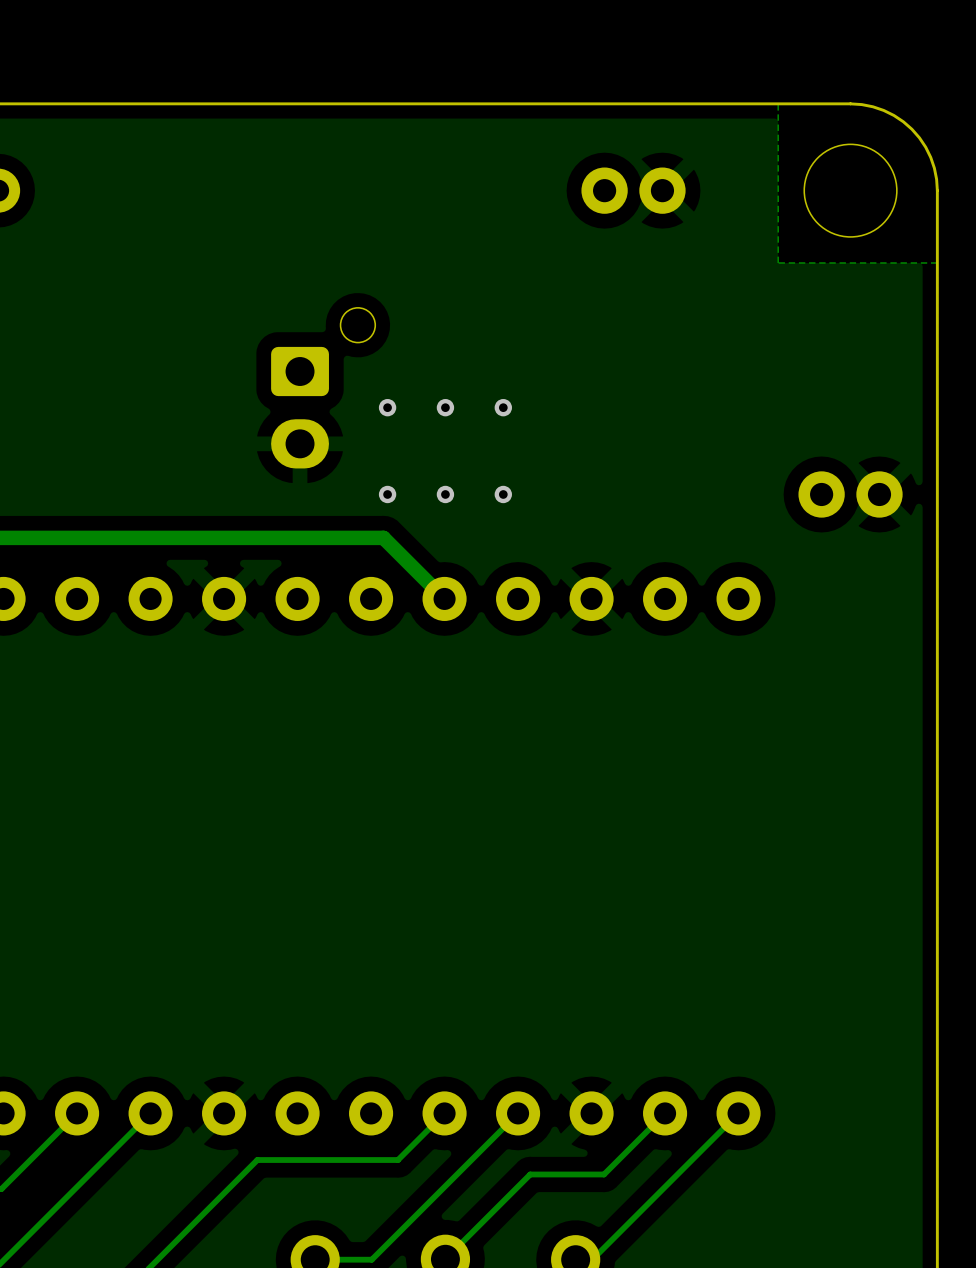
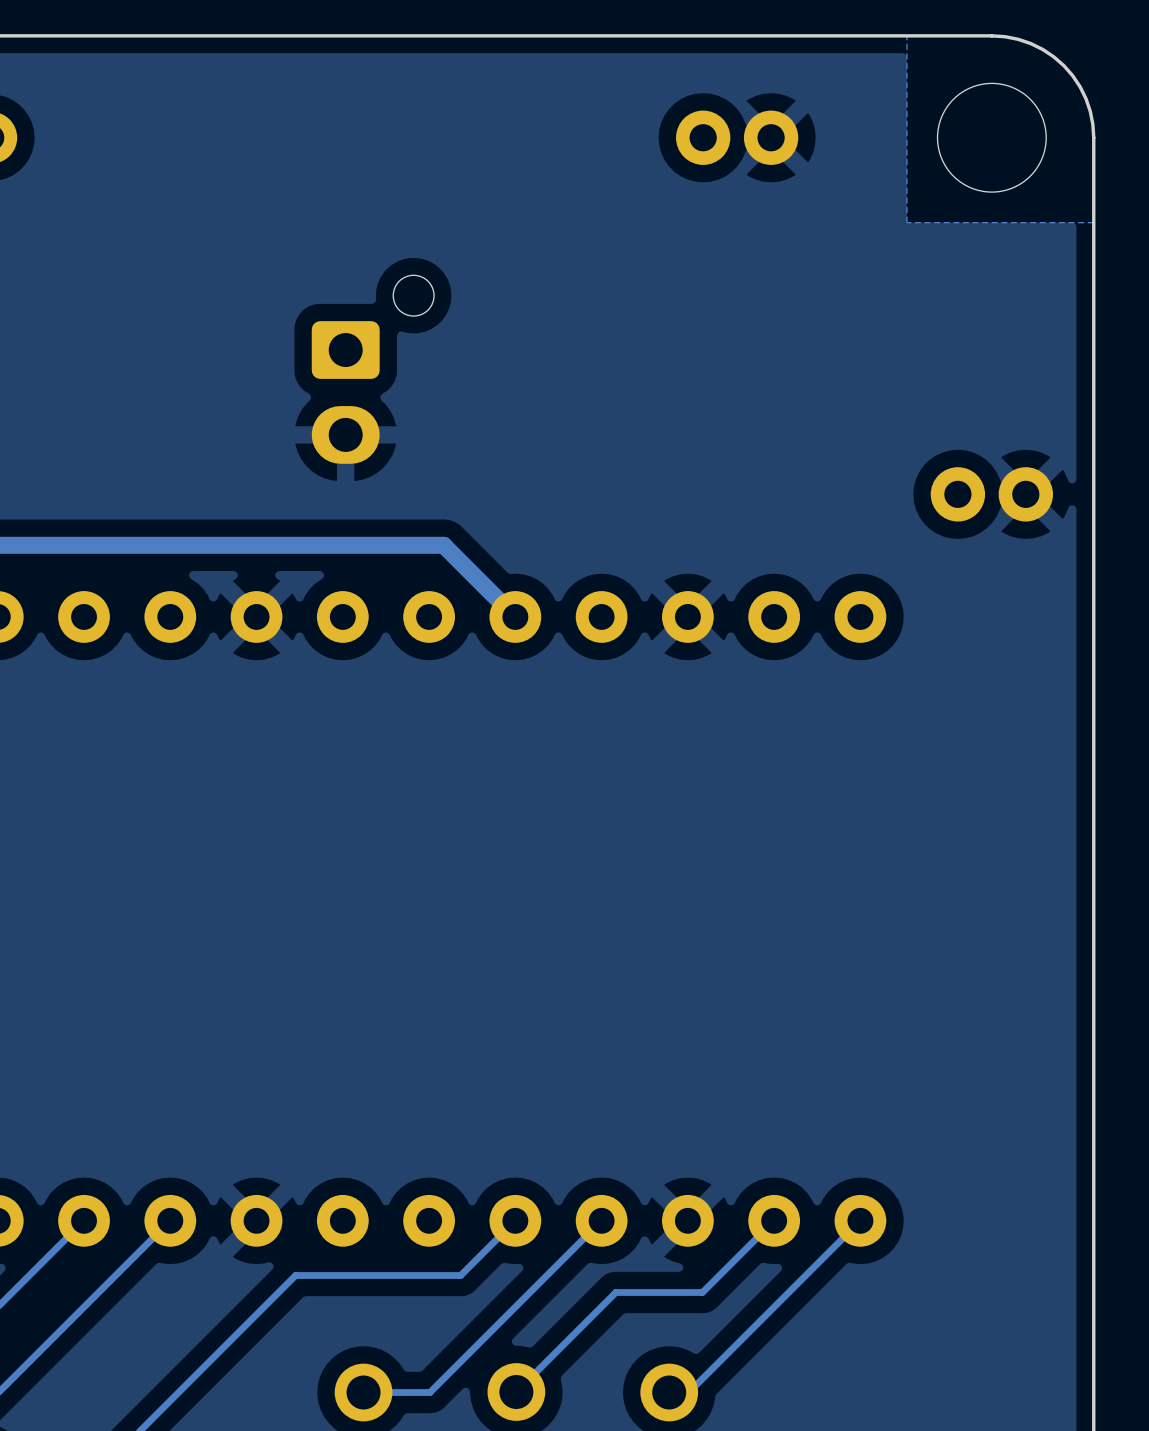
via: (387, 407) -> none
via: (445, 407) -> none
via: (503, 407) -> none
via: (387, 494) -> none
via: (445, 494) -> none
via: (503, 494) -> none

